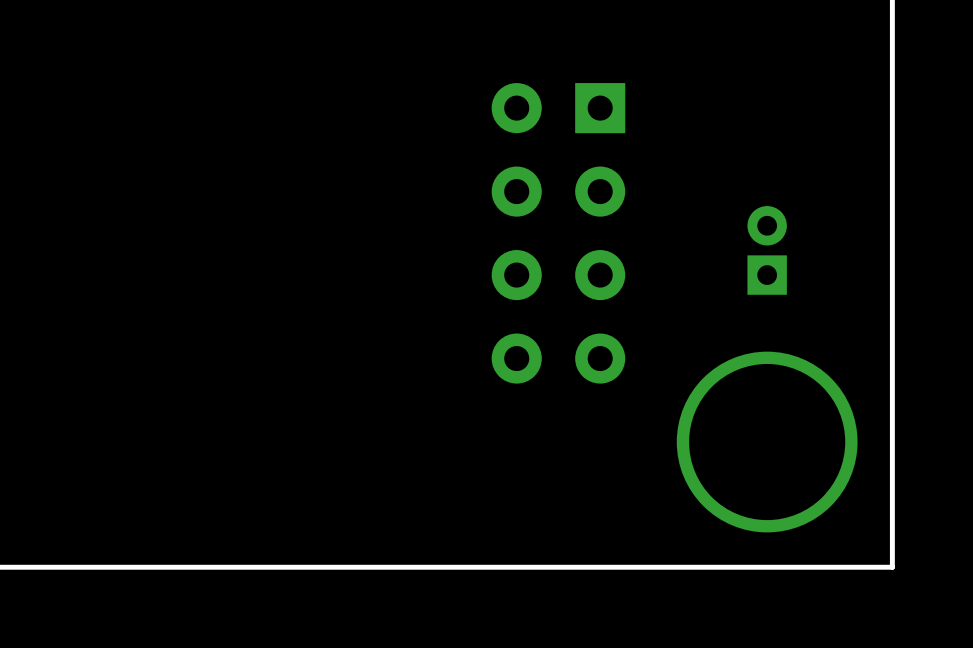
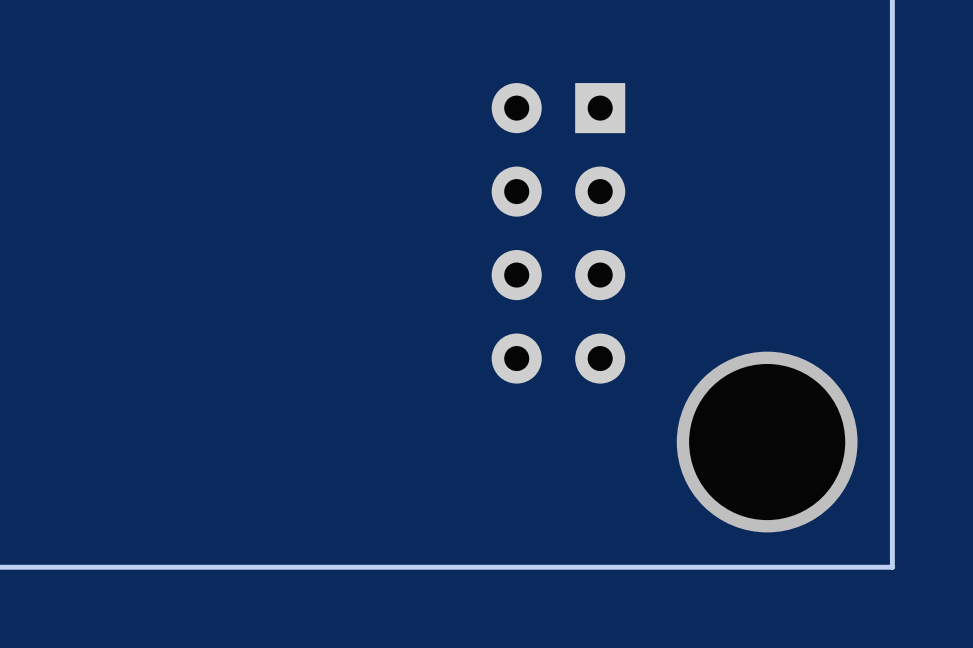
part: (767, 250) -> none

